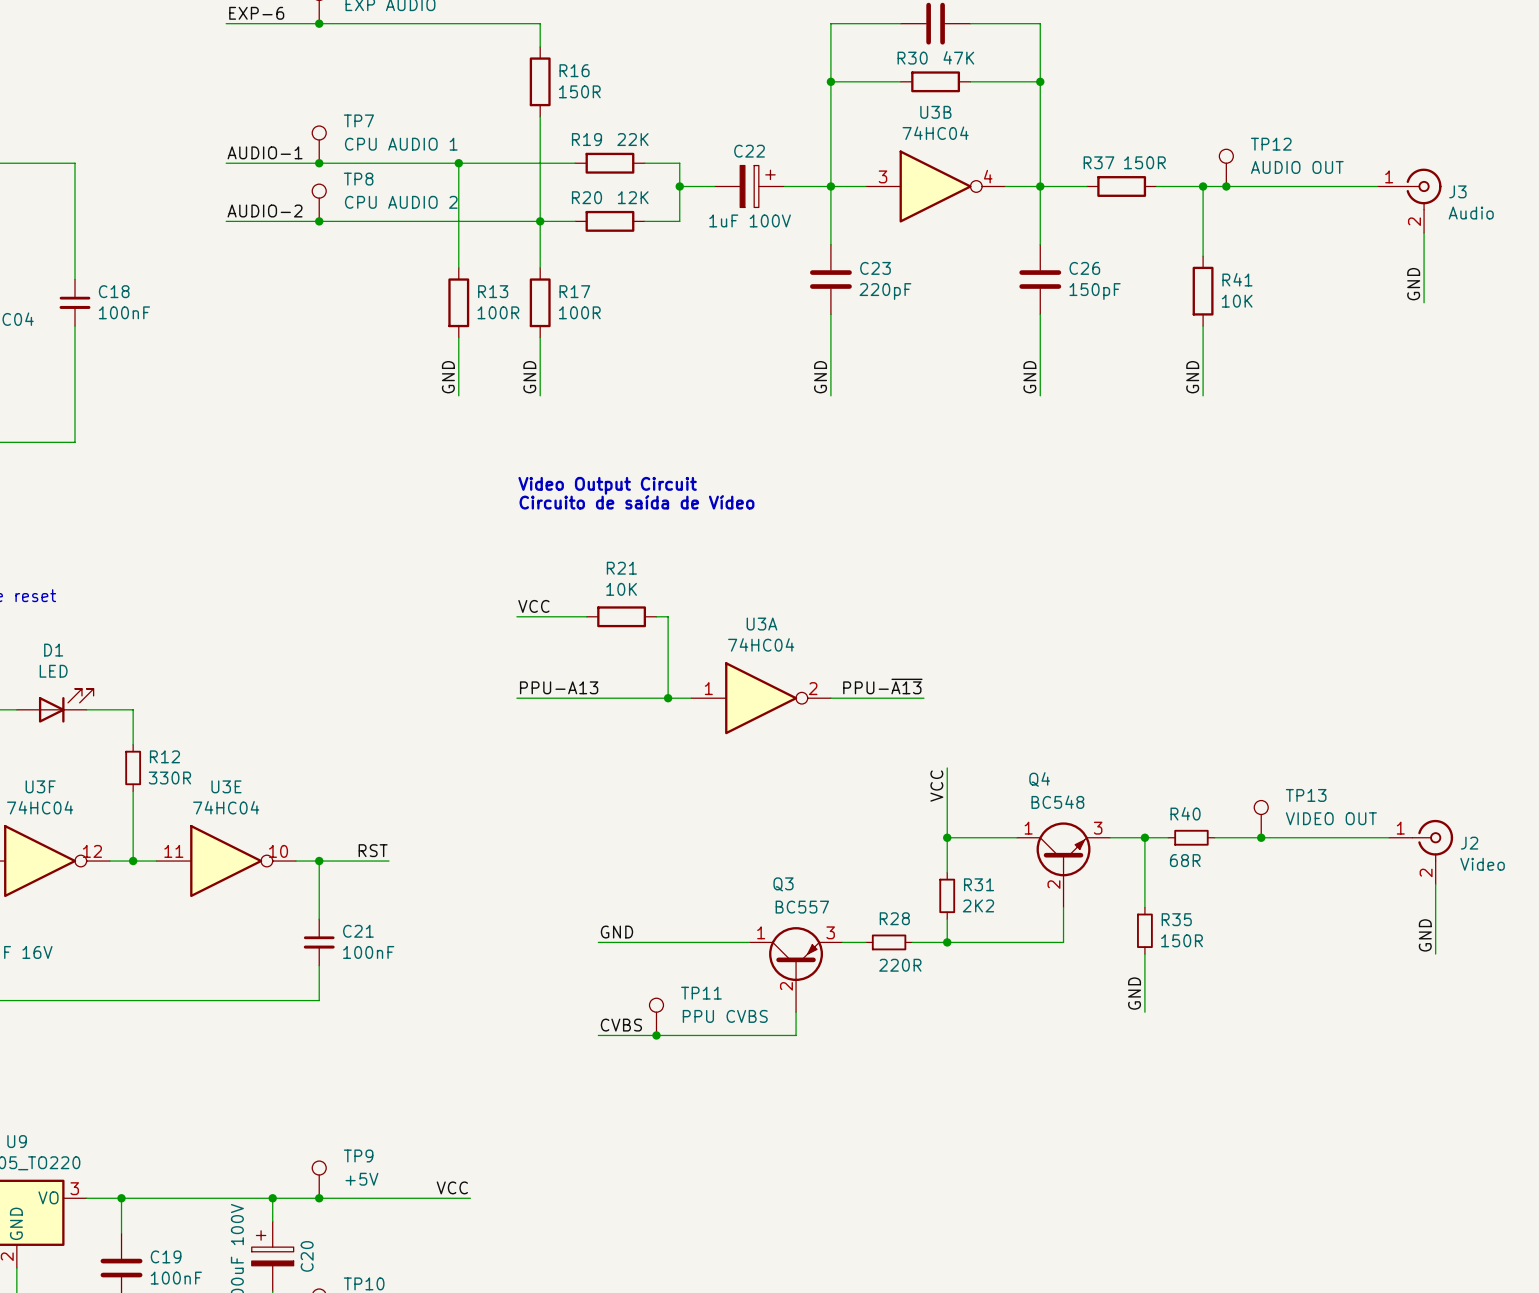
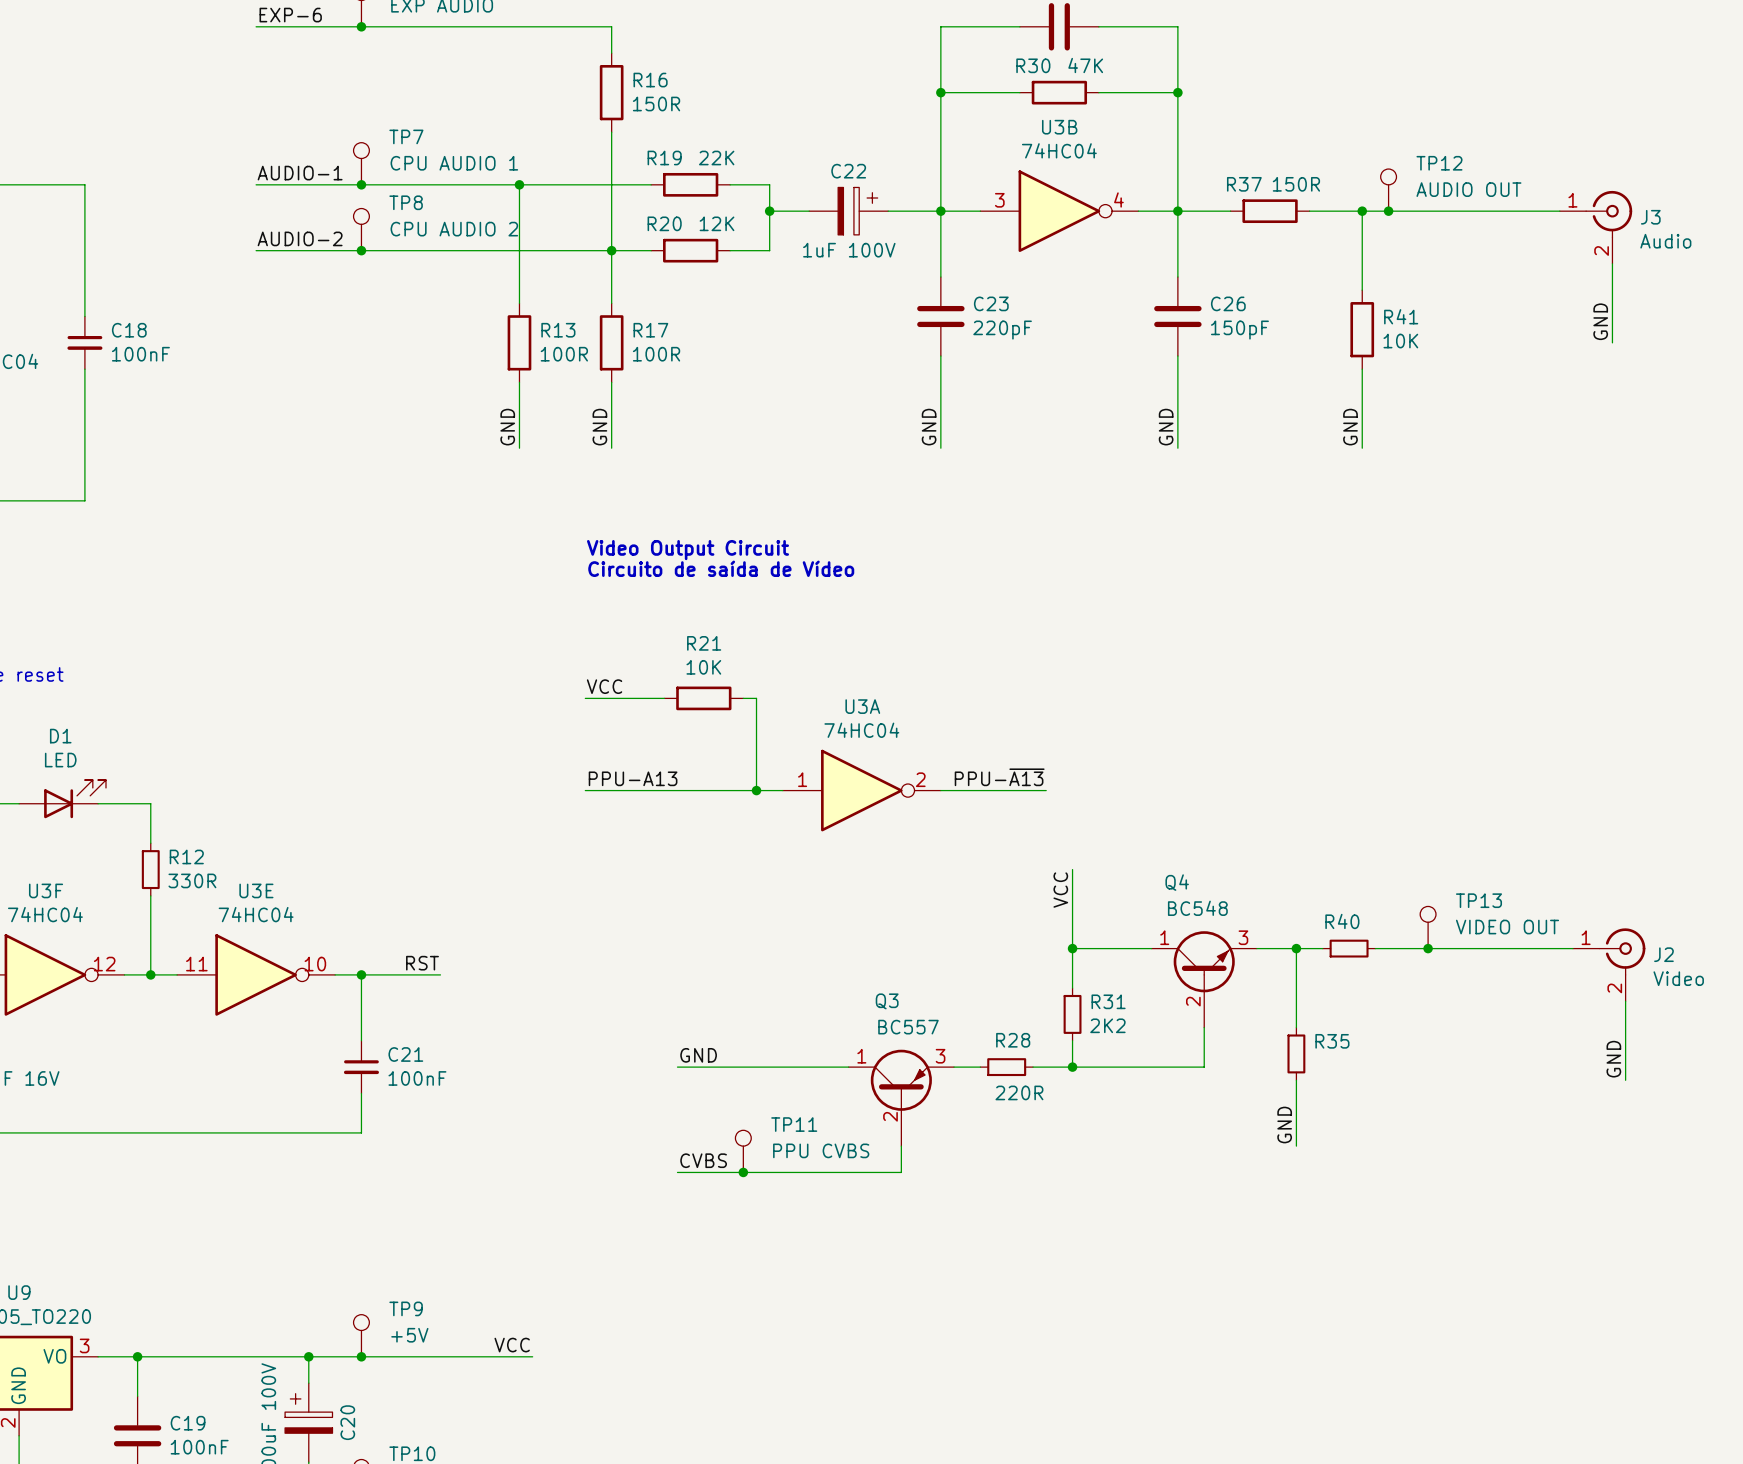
R40 value: 68R (1185, 860) -> none
R35 value: 150R (1182, 940) -> none

